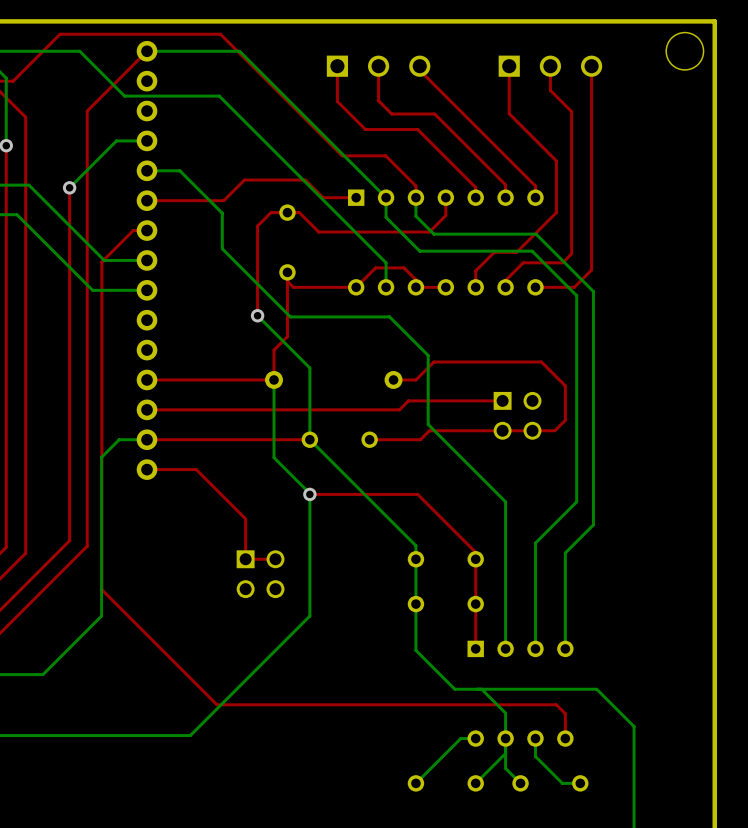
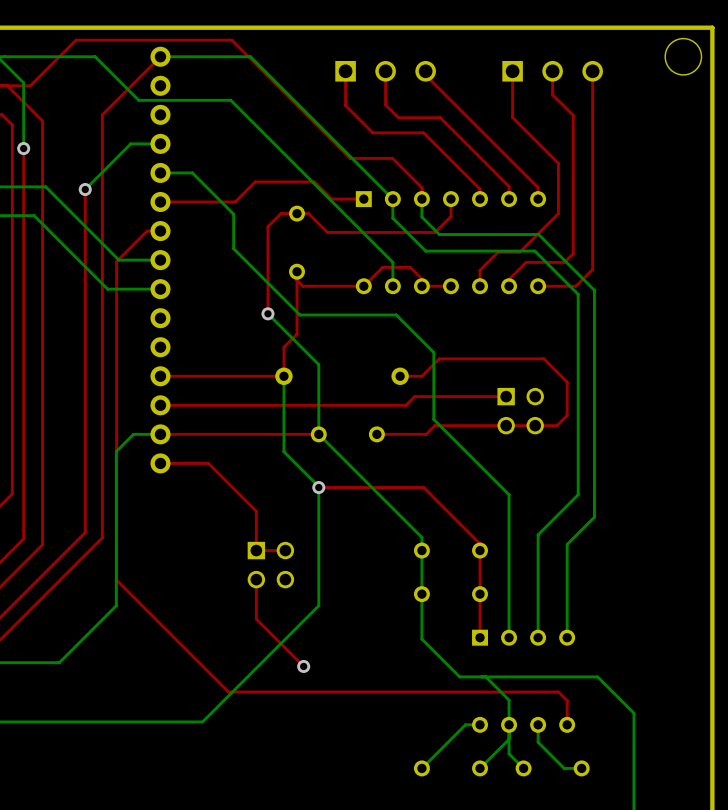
top track: none -> (256, 579) (256, 619) (303, 666)
via: none -> (303, 666)

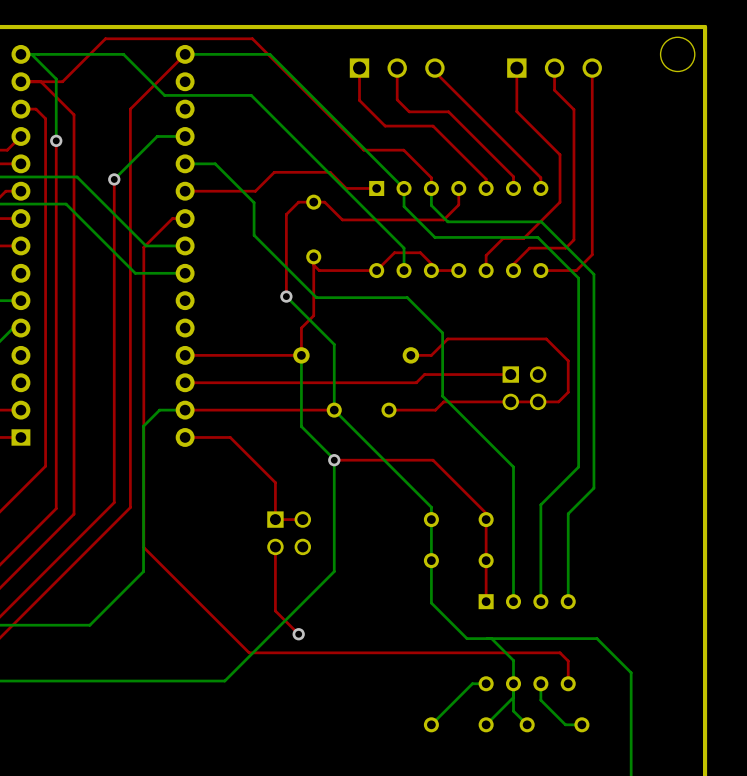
top track: (256, 619) (303, 666) -> (275, 584) (275, 610) (298, 634)
via position: (303, 666) -> (298, 634)

